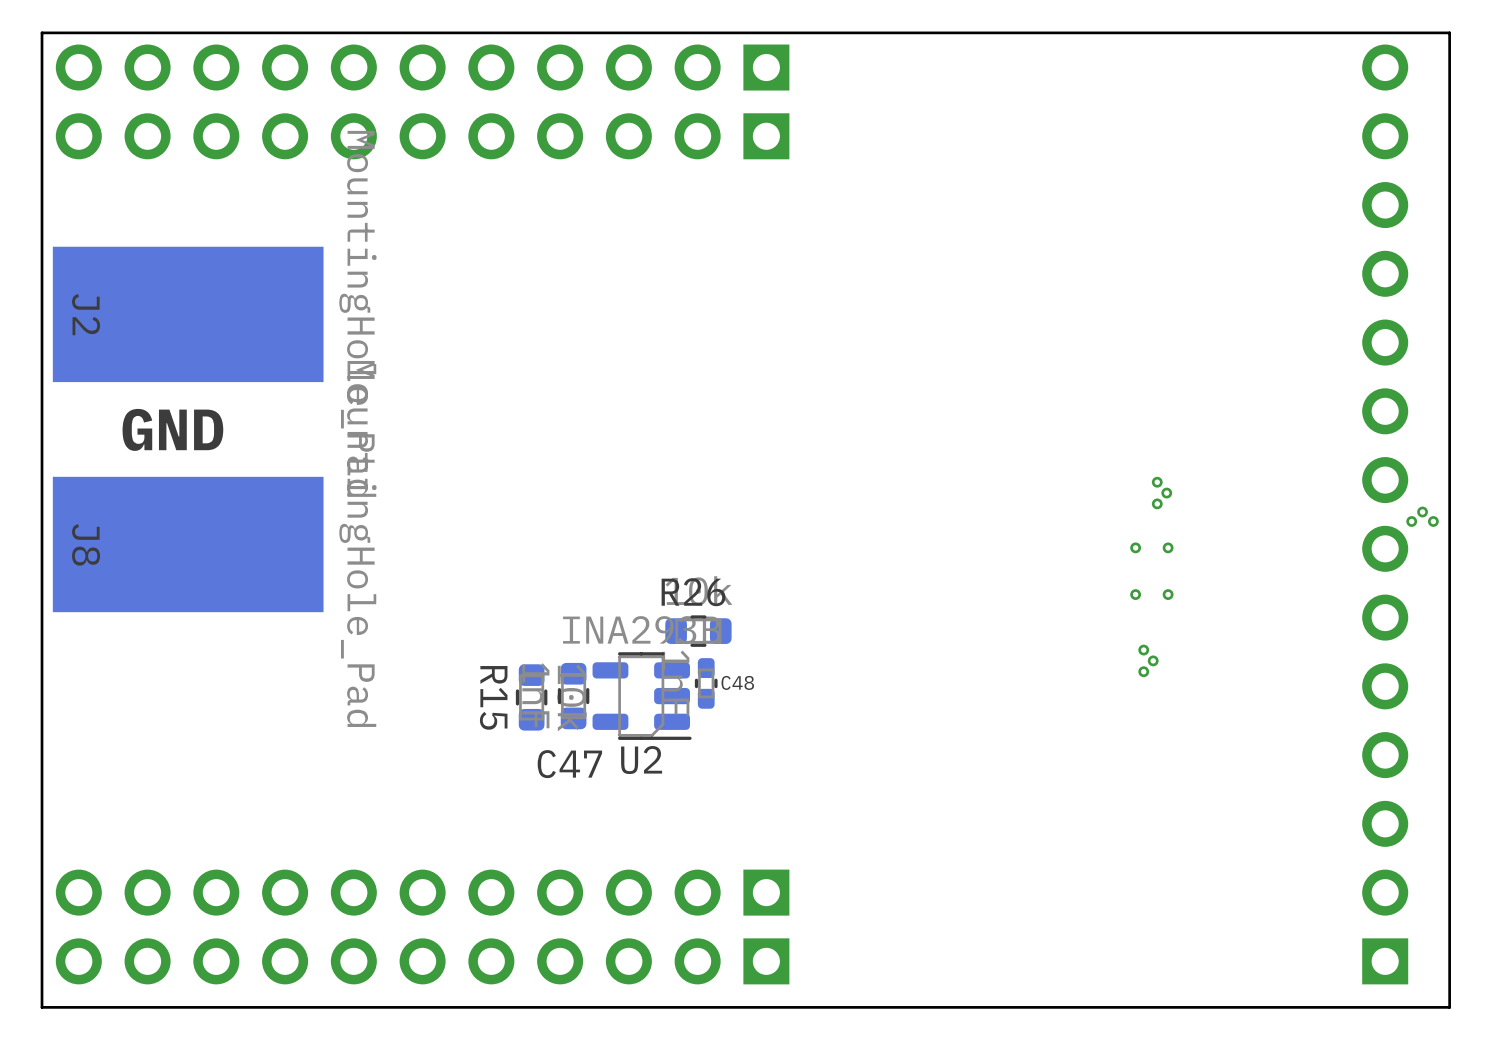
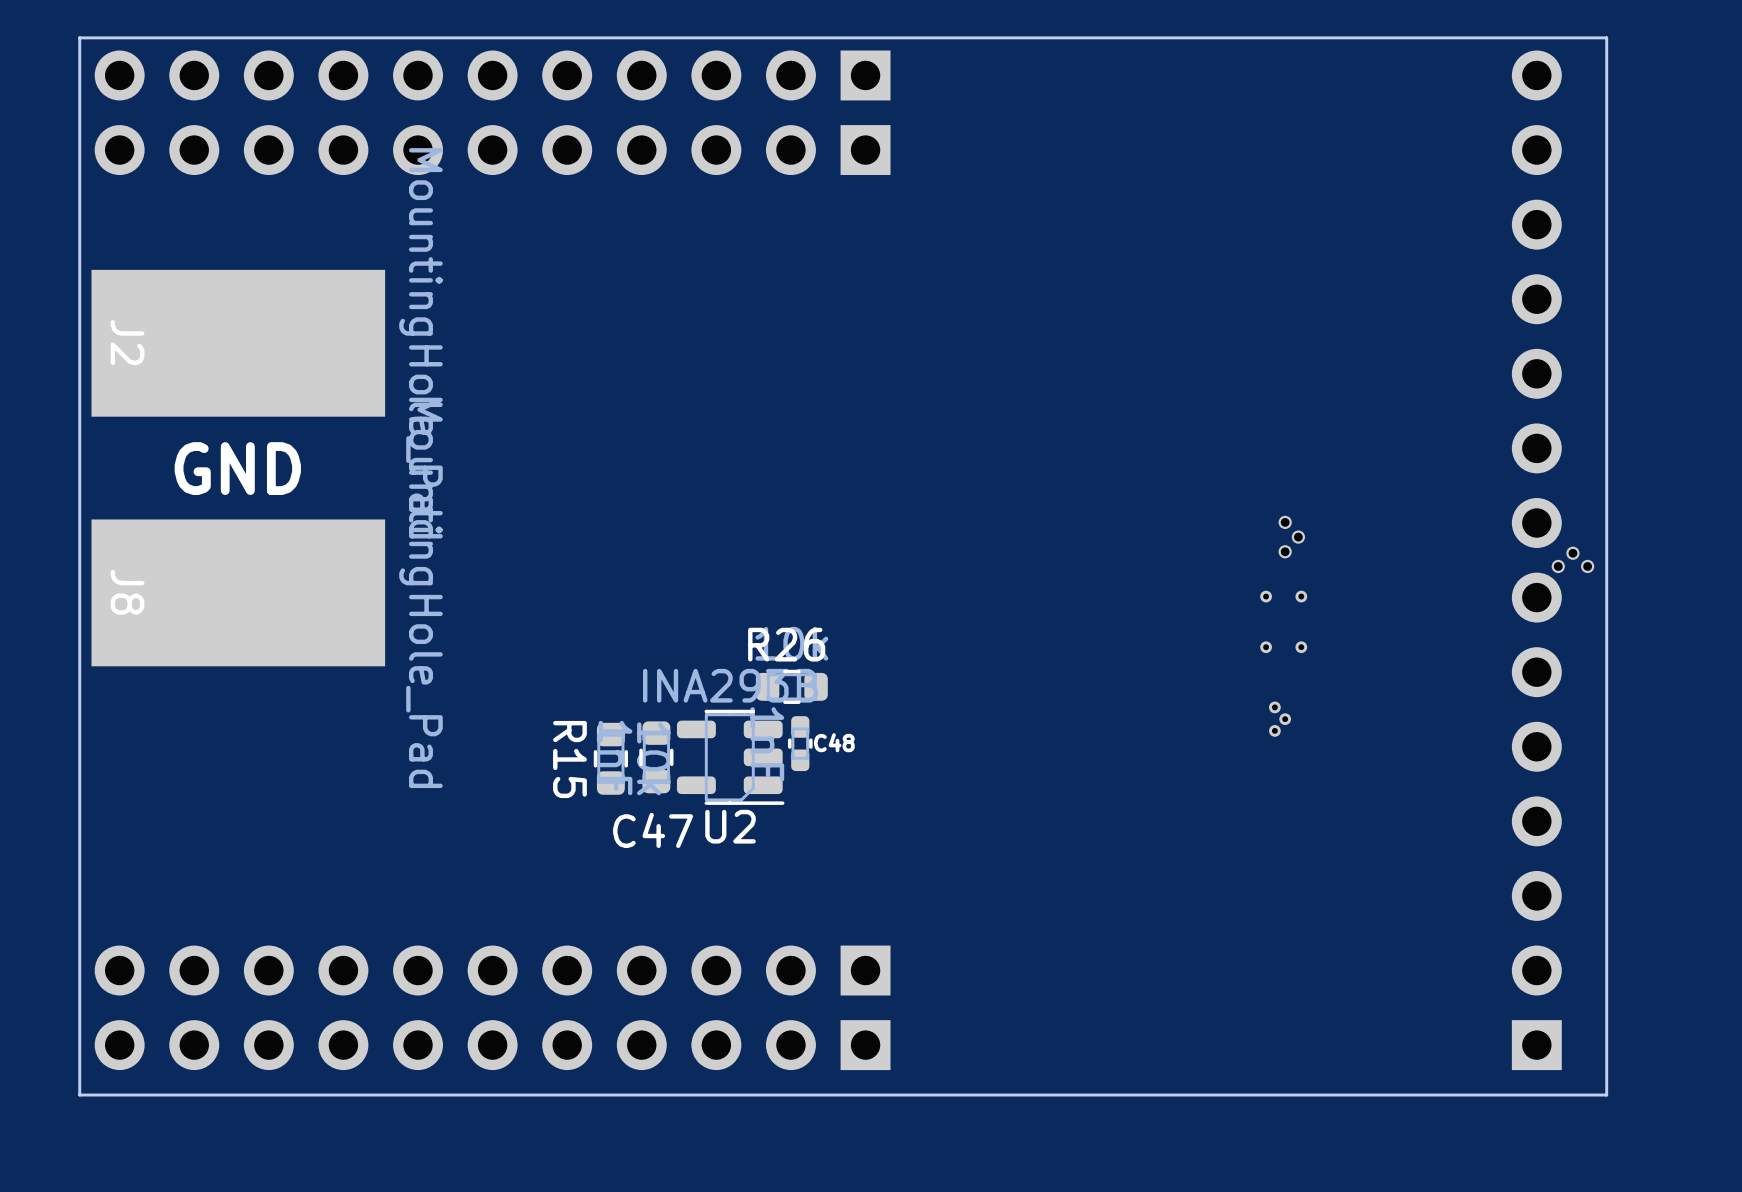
part footprint: [1151, 476, 1173, 510] -> [1278, 515, 1305, 559]
part footprint: [1406, 506, 1439, 527] -> [1551, 546, 1595, 574]

